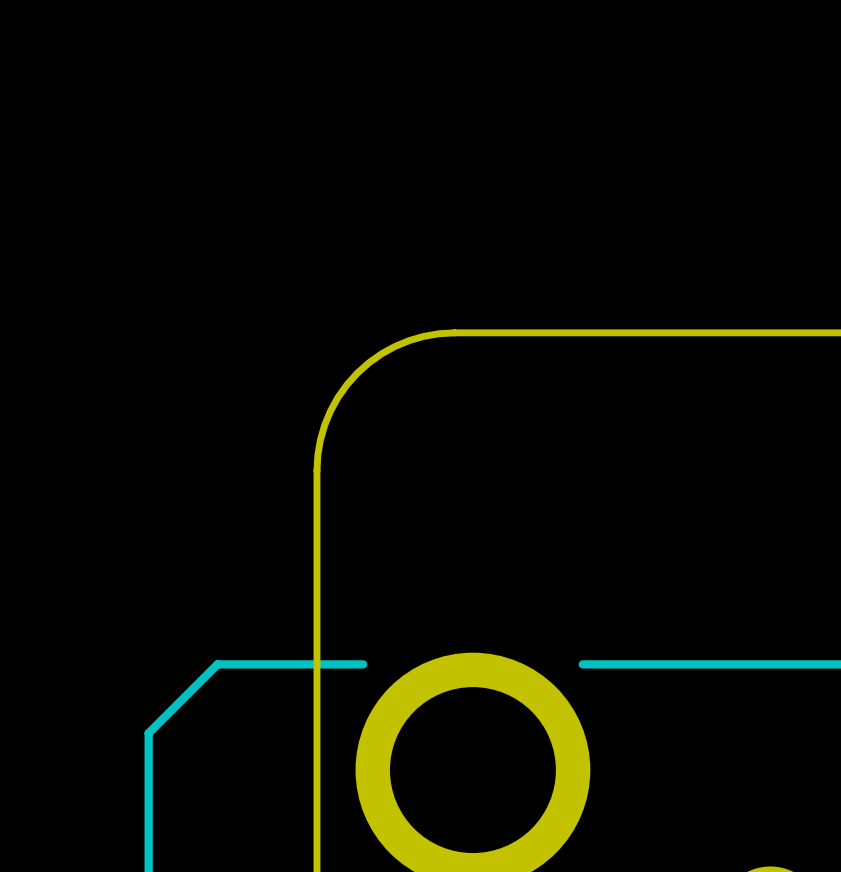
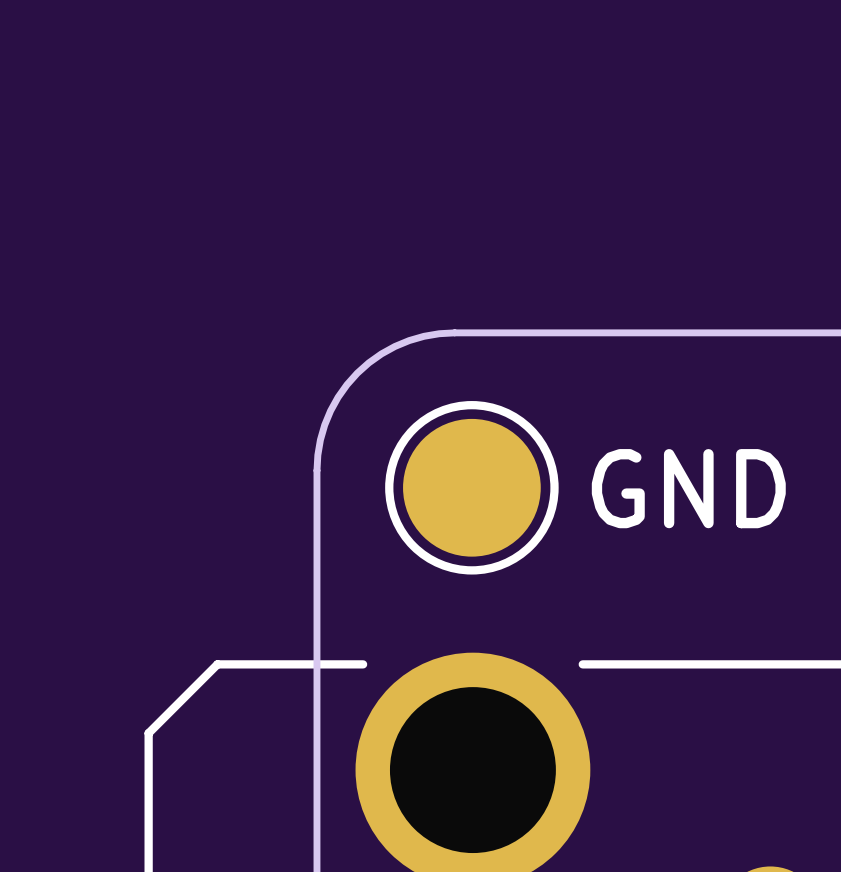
part: none -> (471, 487)
text: none -> GND (688, 488)

